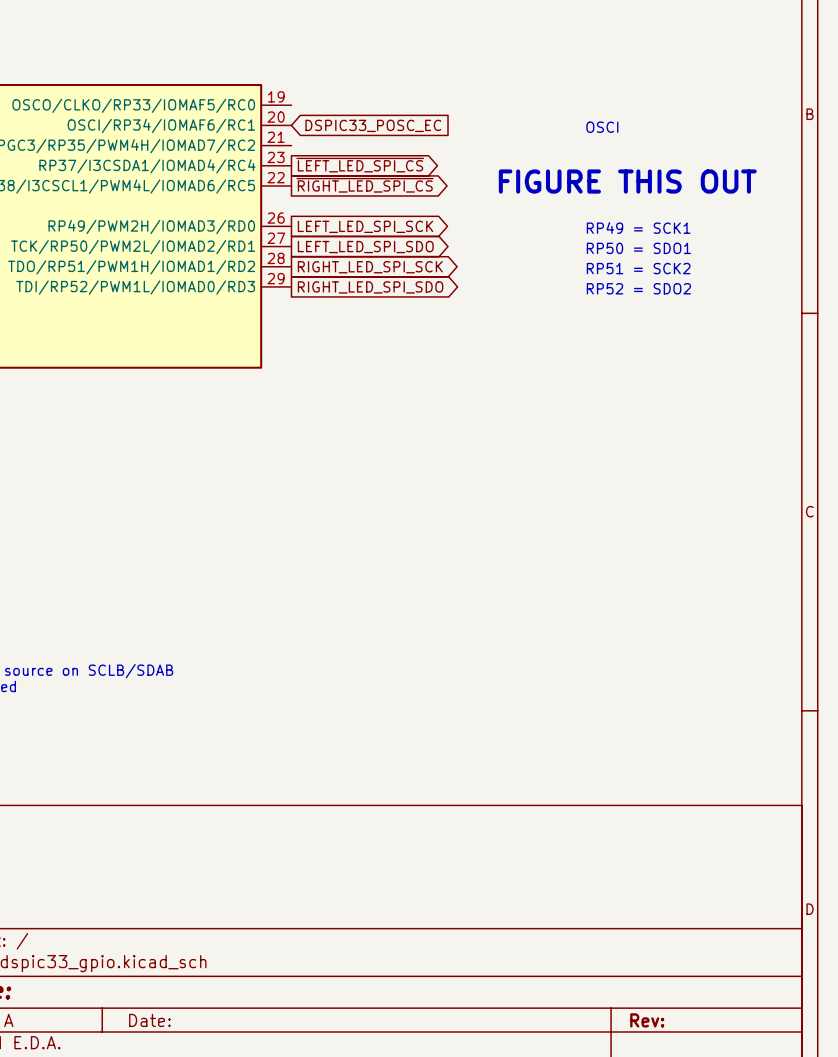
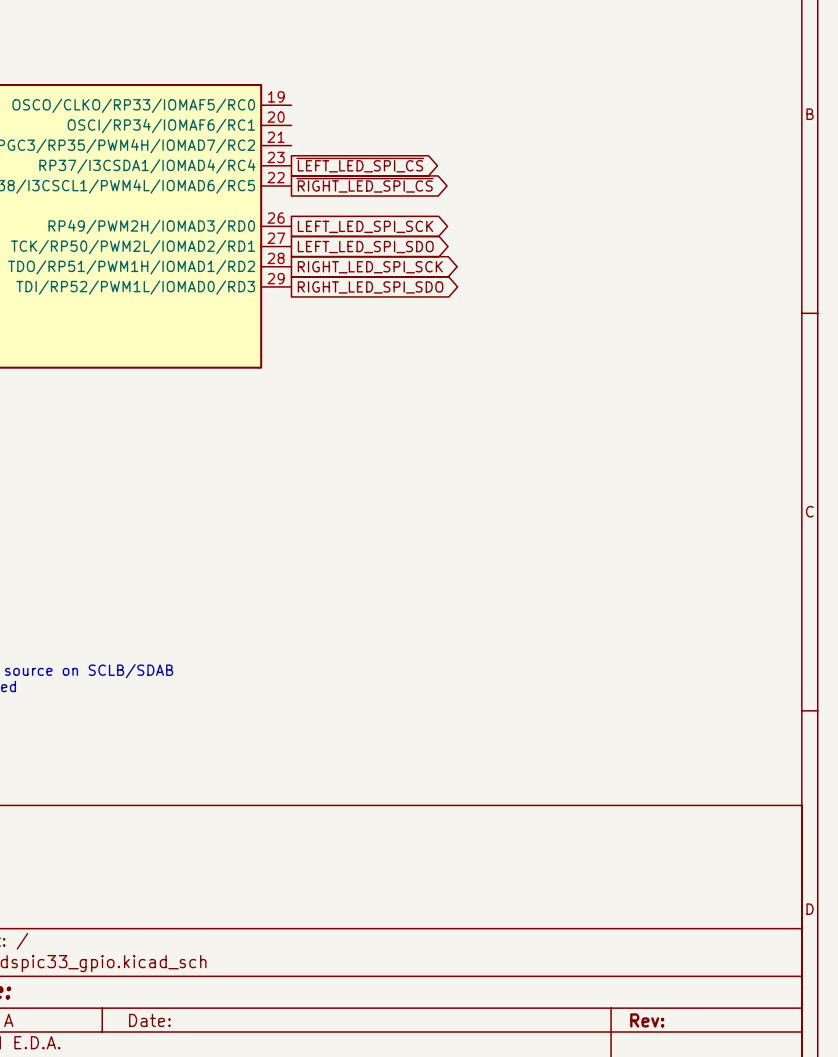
global label: DSPIC33_POSC_EC (373, 125) -> none
text: OSCI (602, 127) -> none
text: FIGURE THIS OUT (627, 181) -> none
text: RP49 = SCK1 (638, 227) -> none
text: RP50 = SDO1 (638, 248) -> none
text: RP51 = SCK2 (638, 268) -> none
text: RP52 = SDO2 (638, 288) -> none

